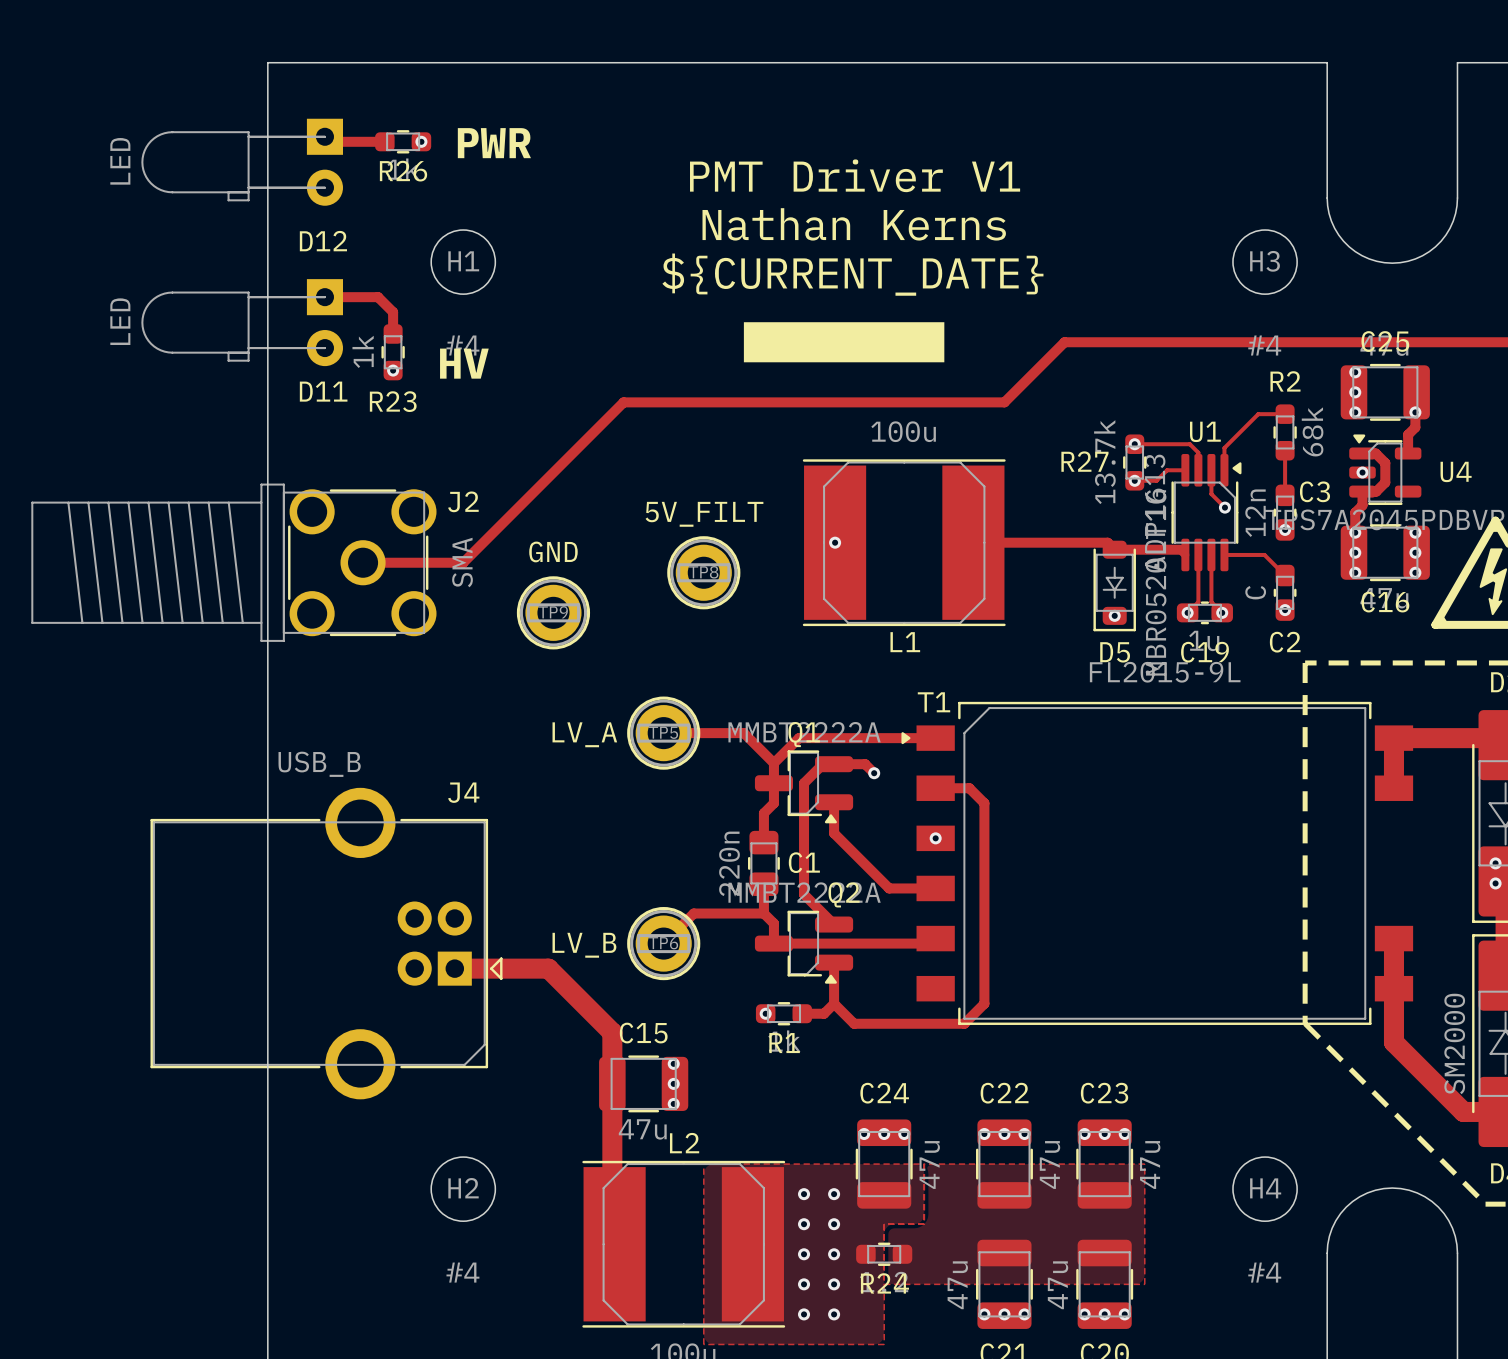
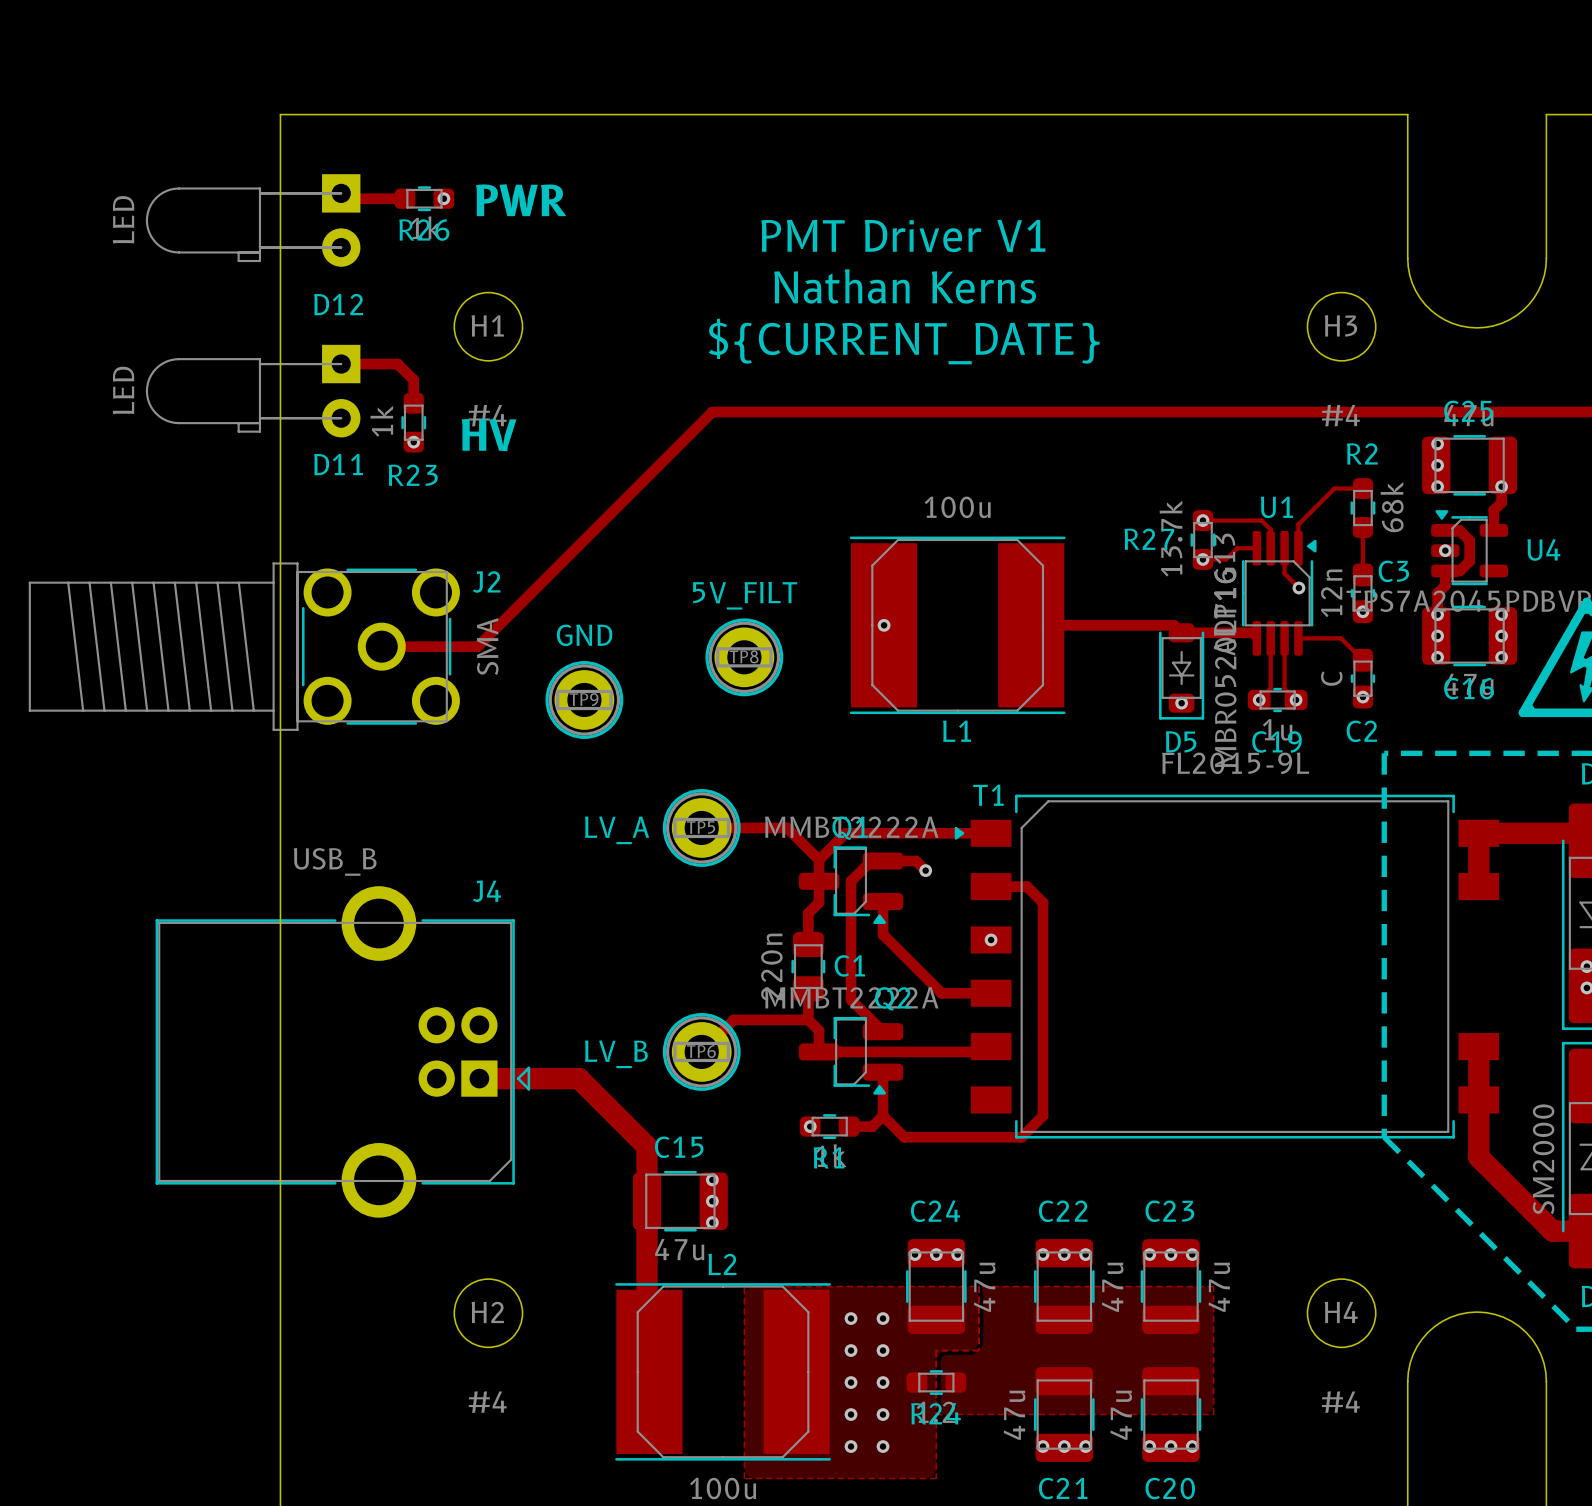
drawing: [743, 322, 945, 363] -> none
track: (1064, 342) (1004, 402) (623, 402) (463, 562) (453, 562) -> (1128, 412) (712, 412) (477, 646)

